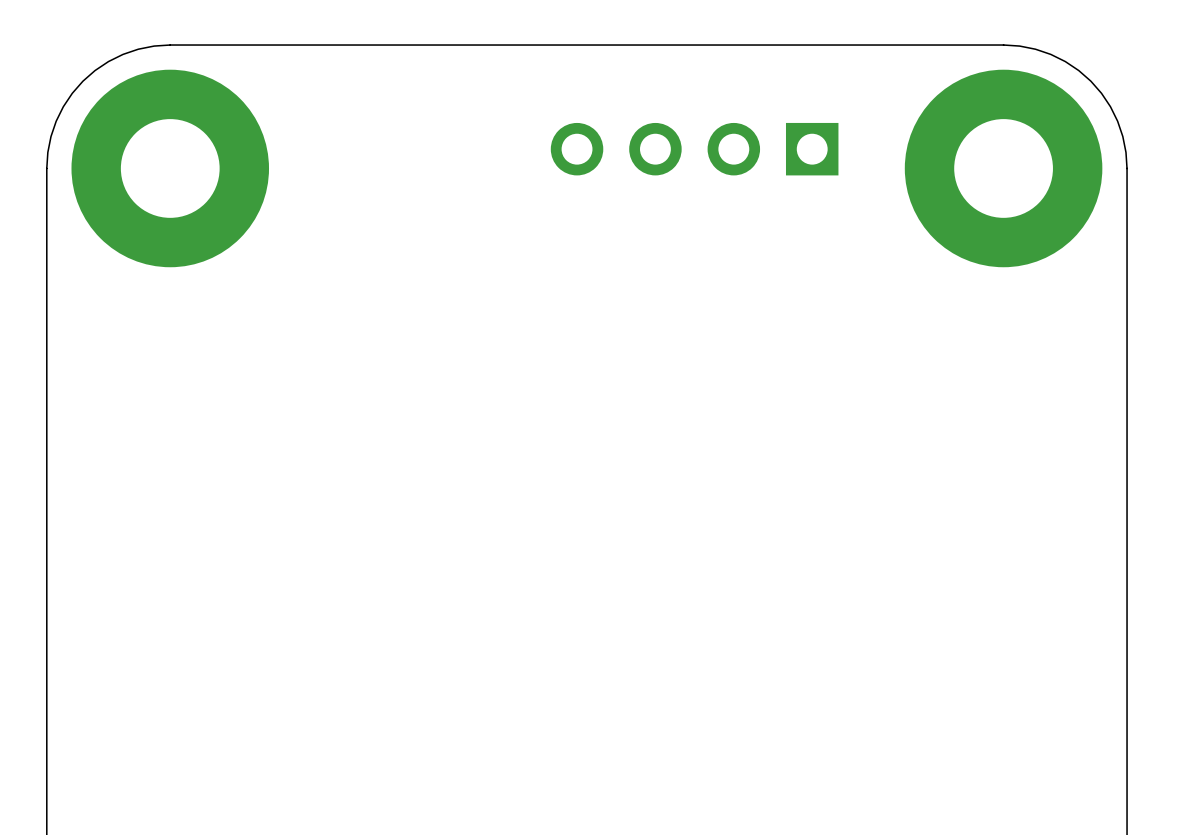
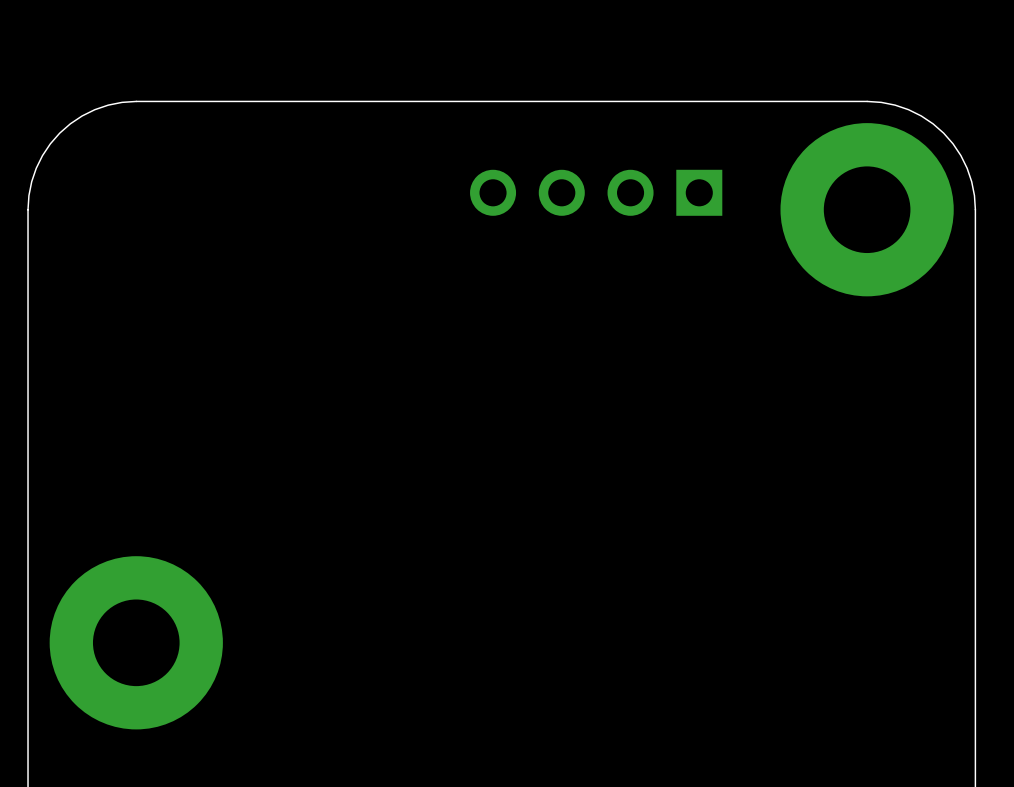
part position: (170, 168) -> (136, 642)

